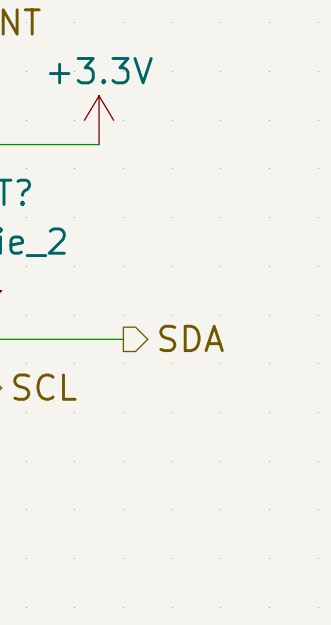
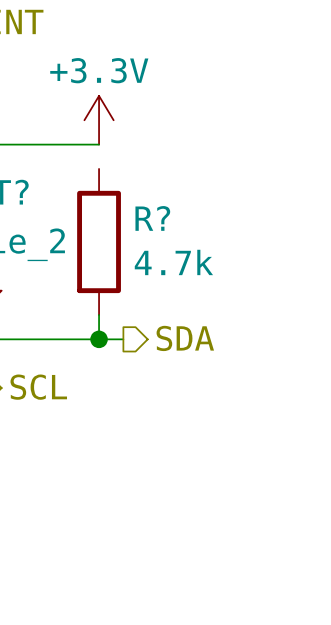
R?: none -> 4.7k (99, 241)
wire: none -> (99, 315) (99, 339)
junction: none -> (99, 339)

